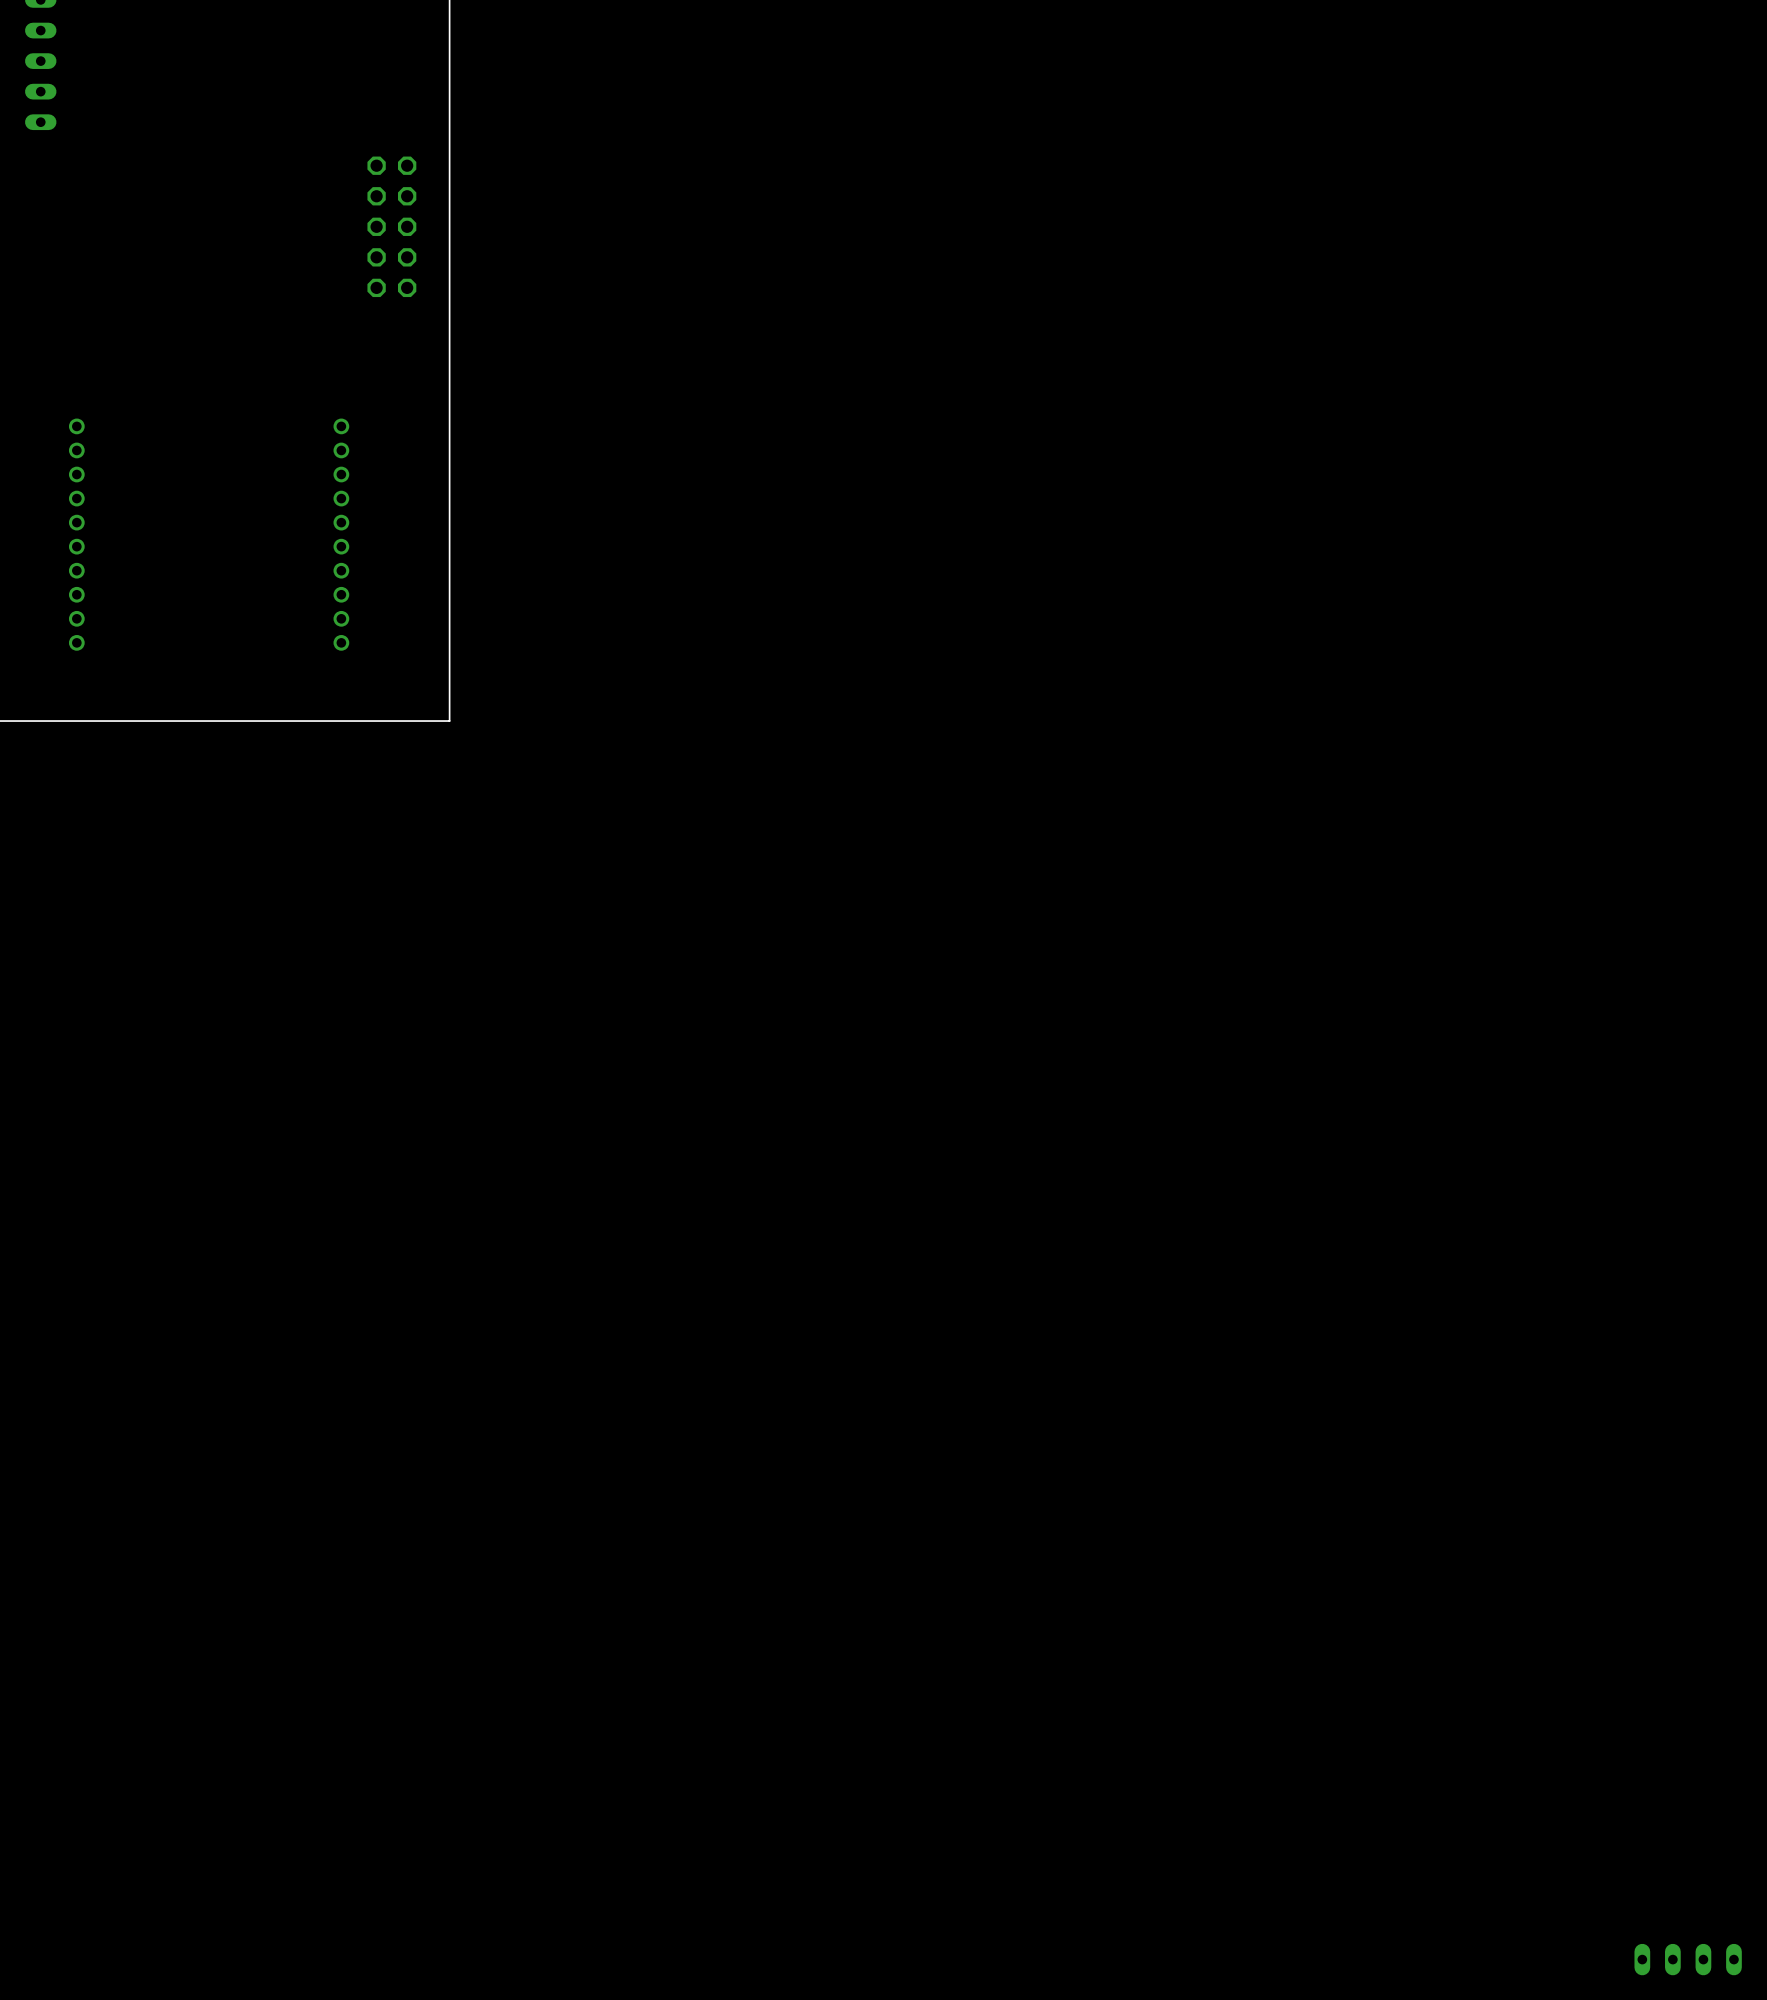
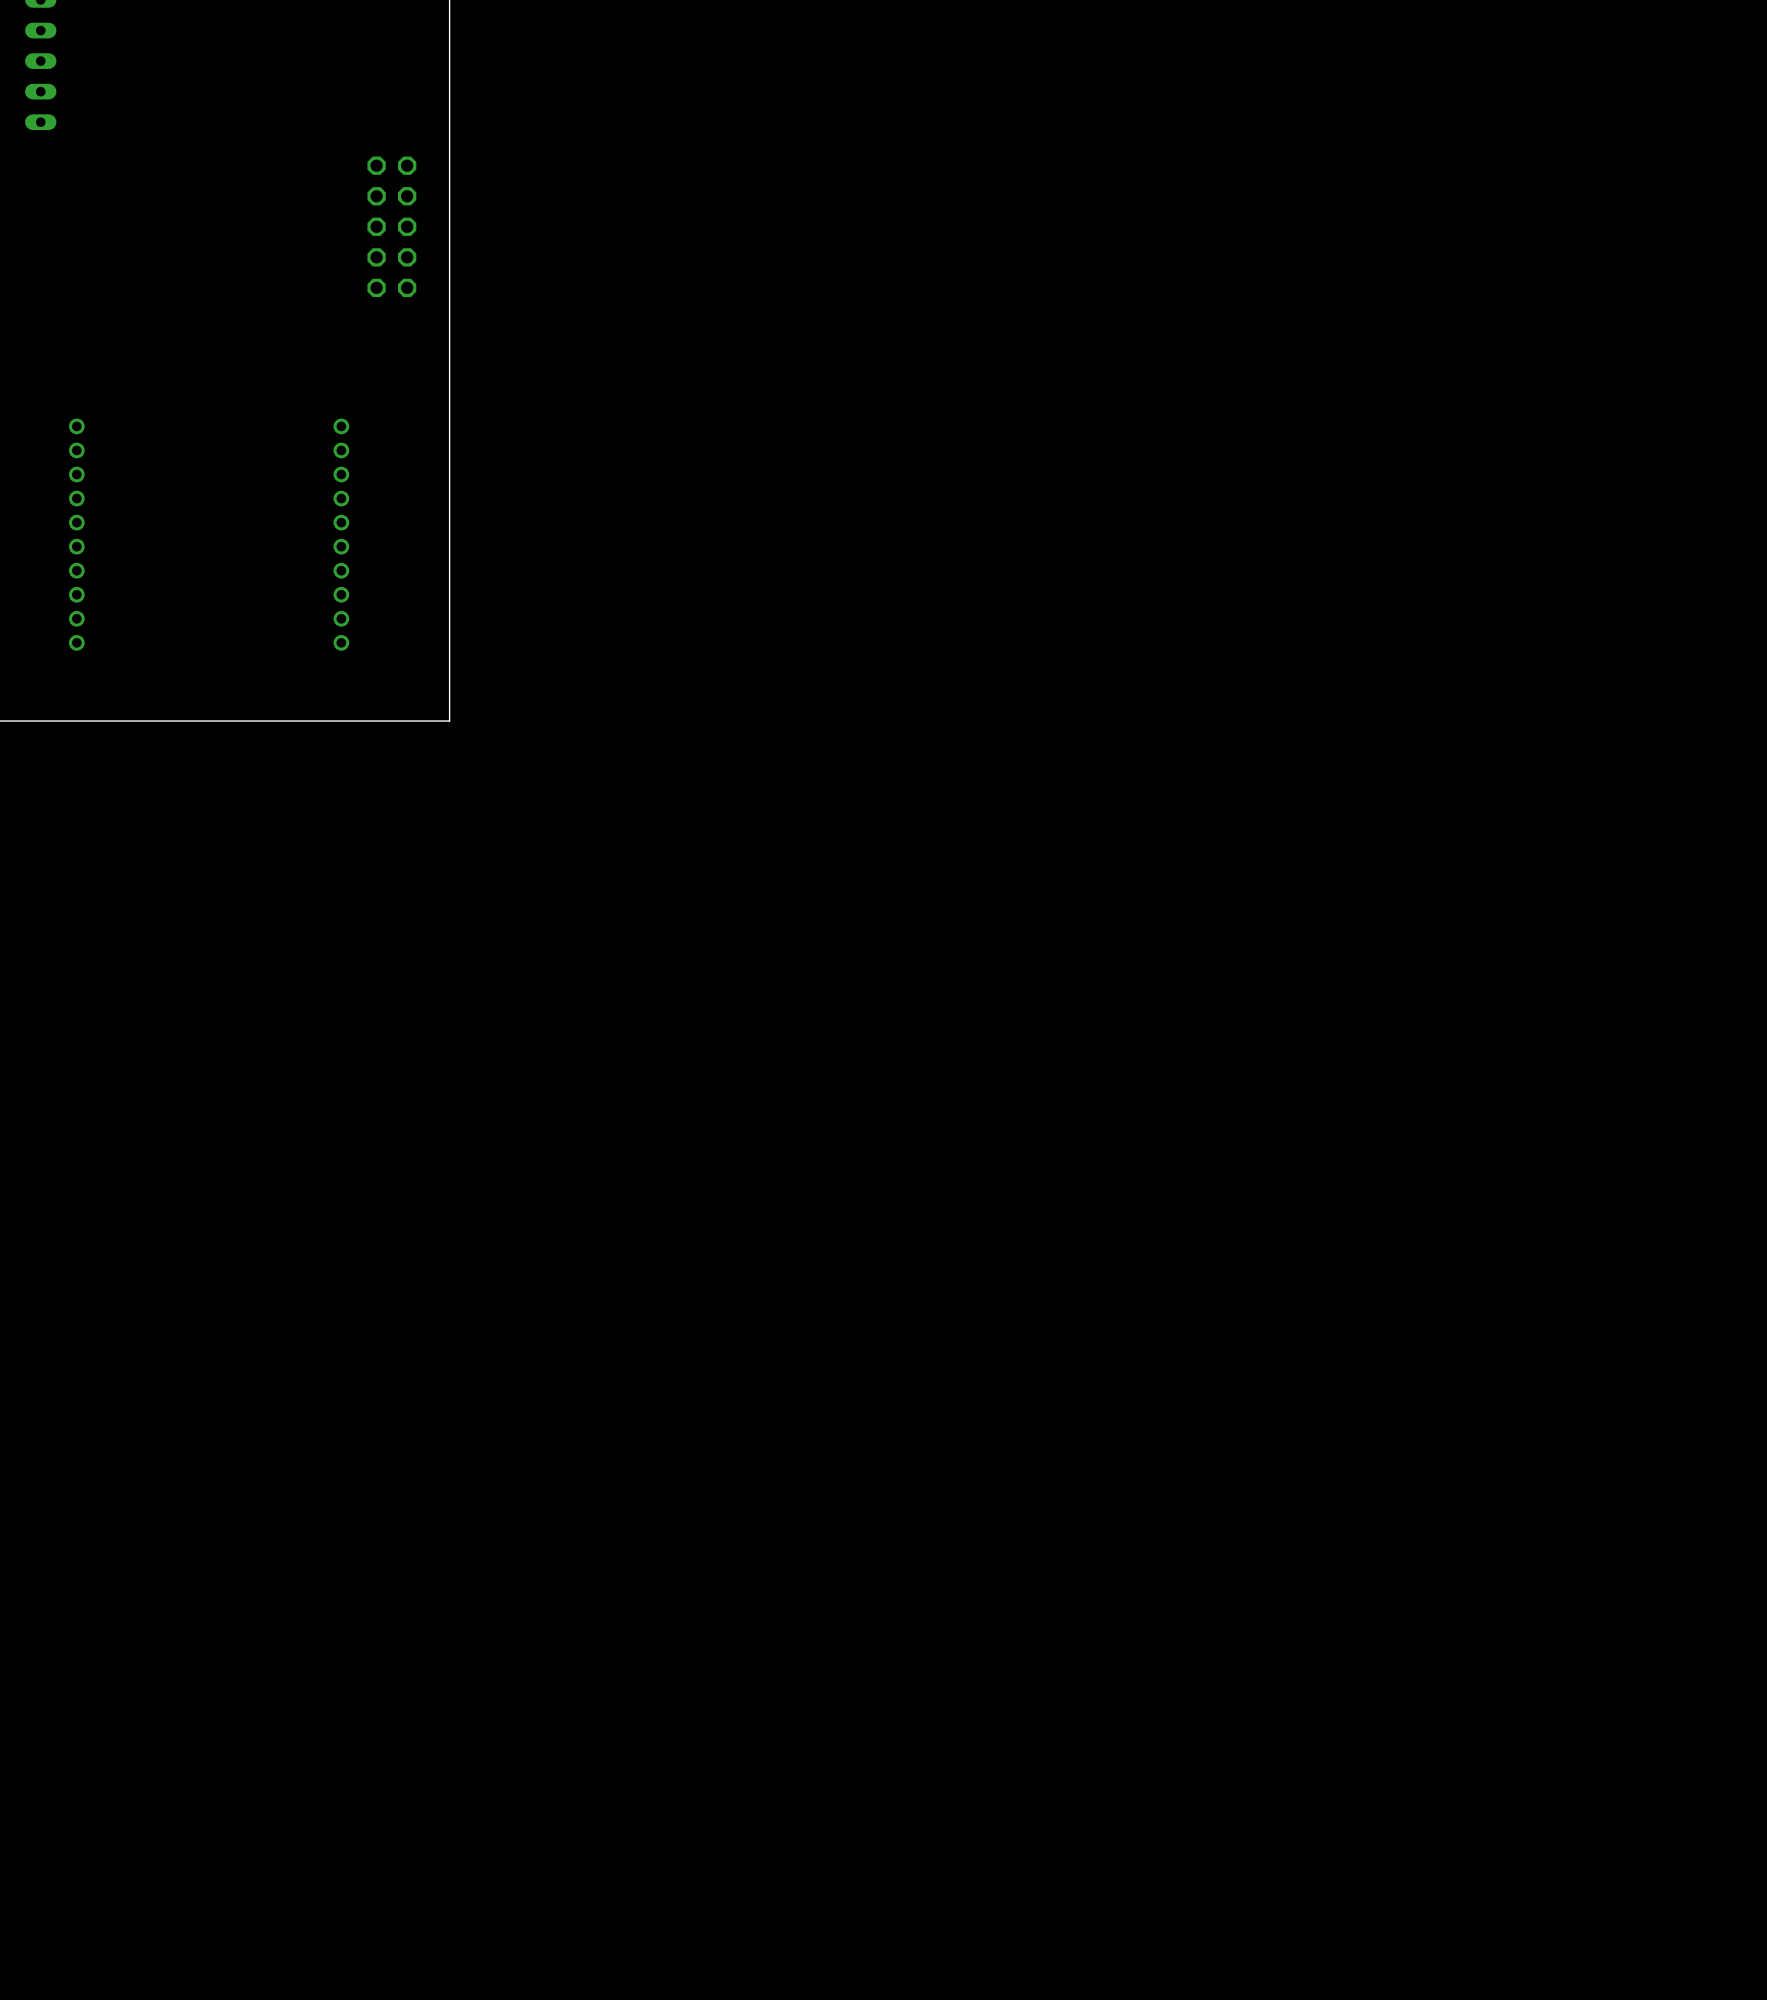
part: (1688, 1959) -> none

